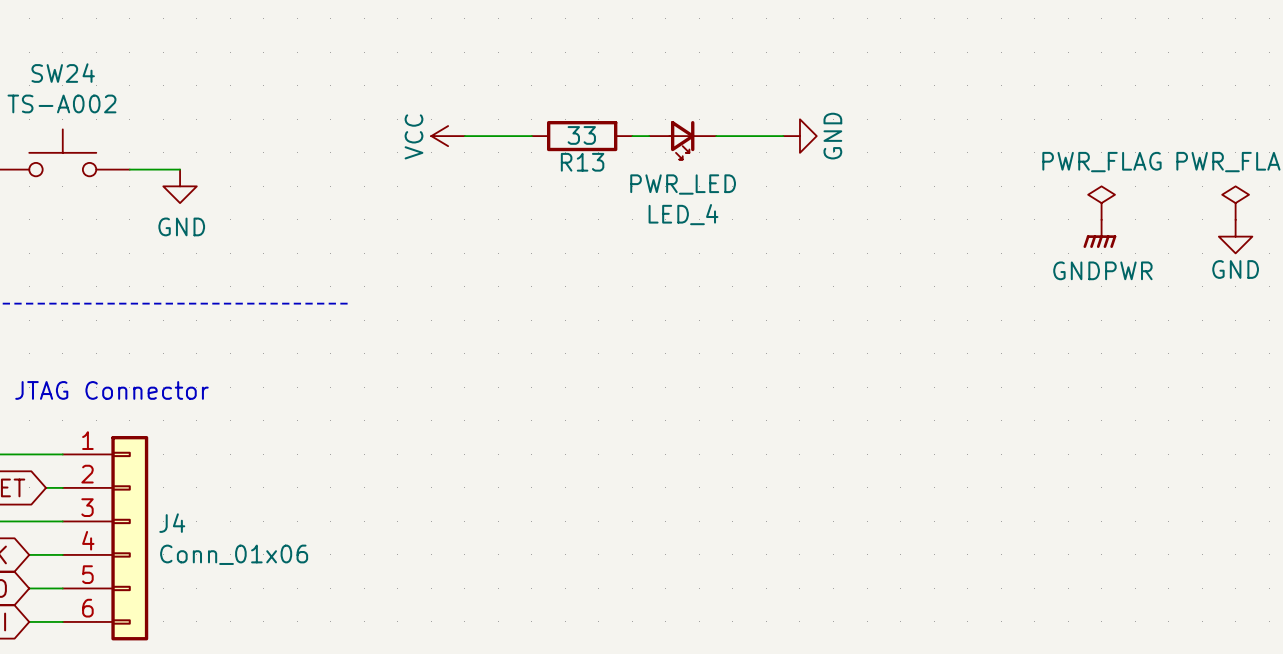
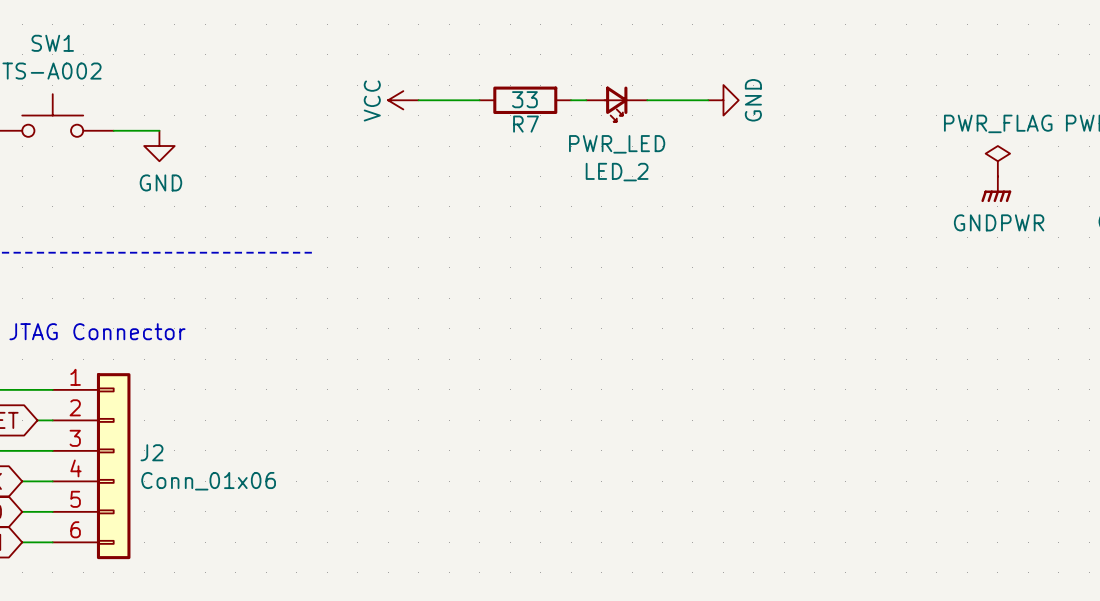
SW24 name: SW24 (63, 73) -> SW1 (52, 43)
R13 name: R13 (582, 162) -> R7 (526, 124)
LED_4 name: LED_4 (683, 214) -> LED_2 (617, 172)
J4 name: J4 (172, 523) -> J2 (152, 452)

